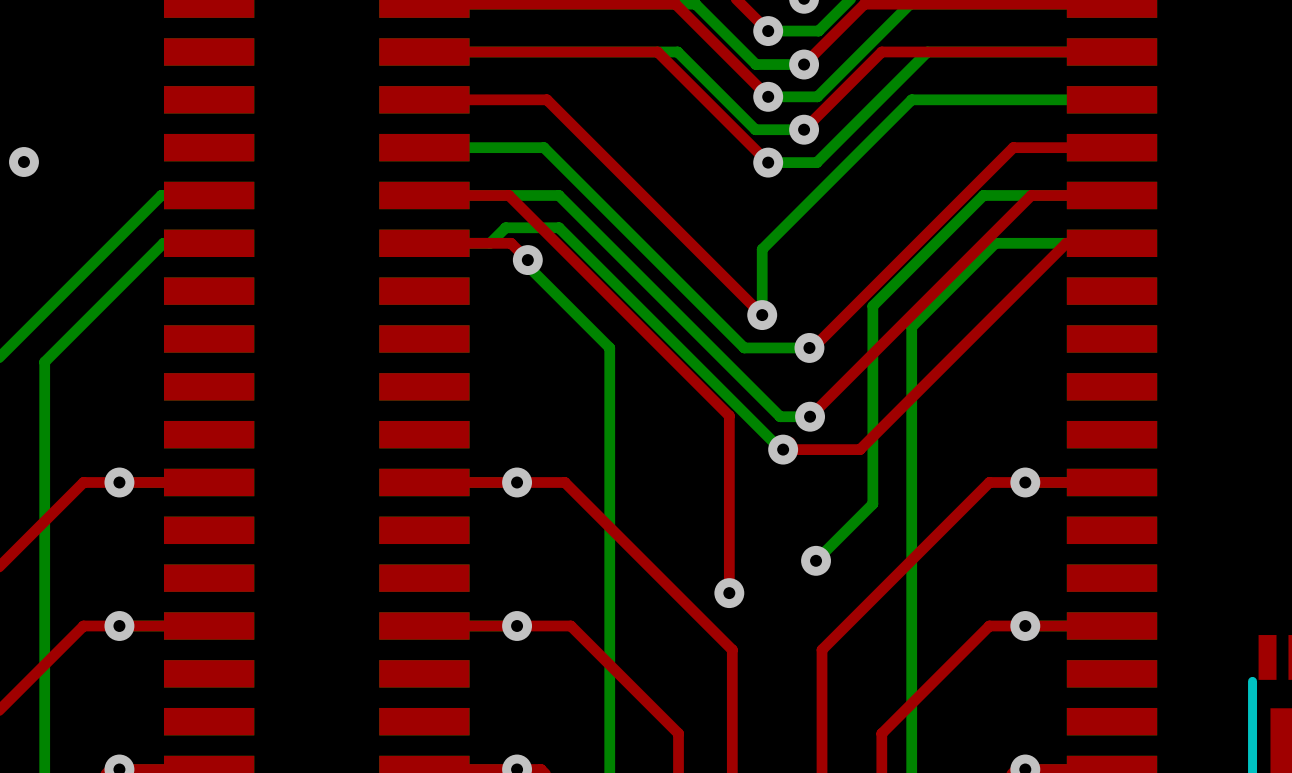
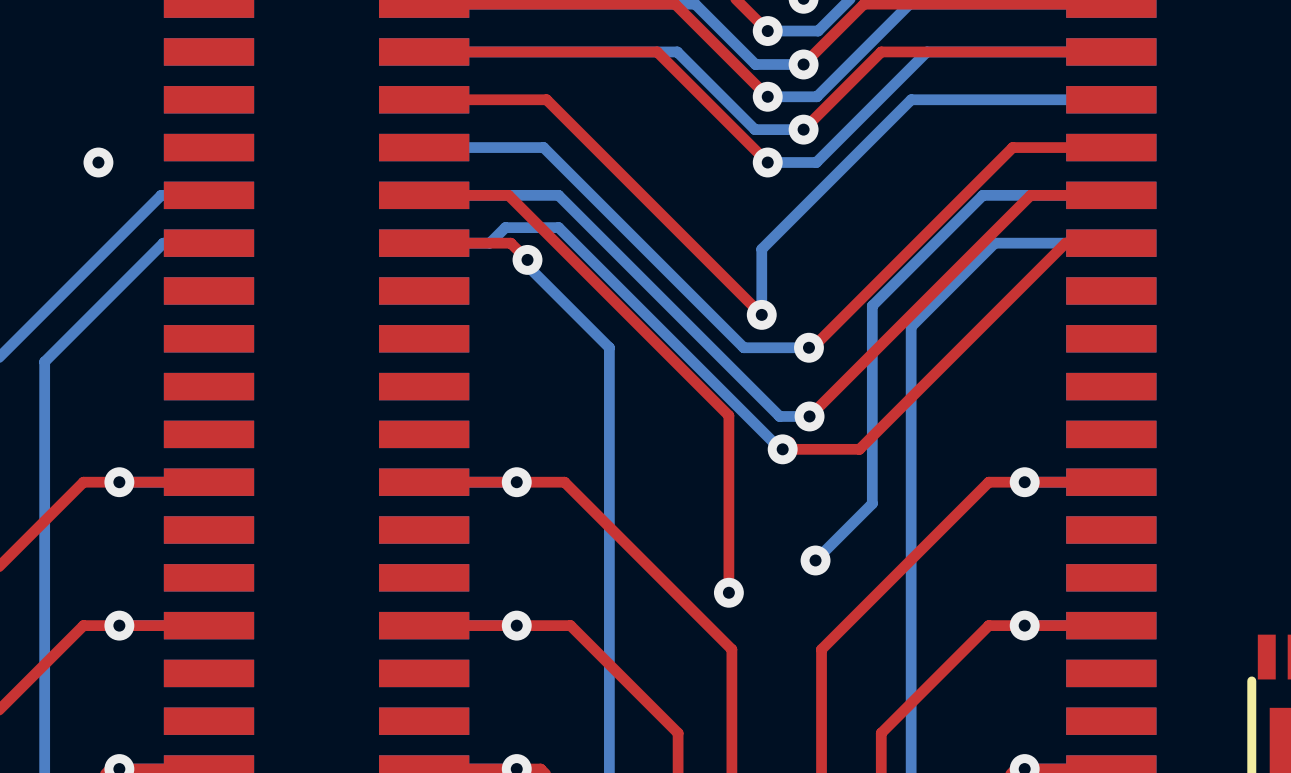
via: (23, 162) -> none
via: none -> (98, 162)

